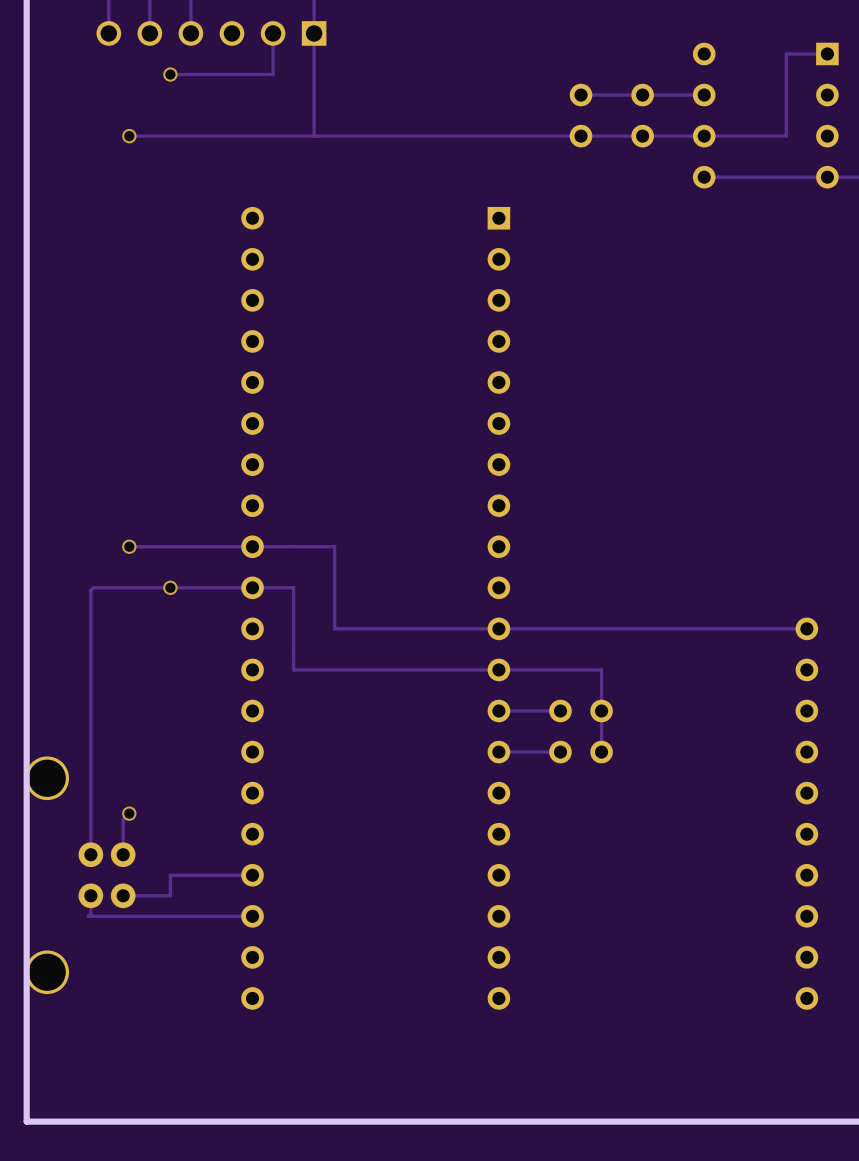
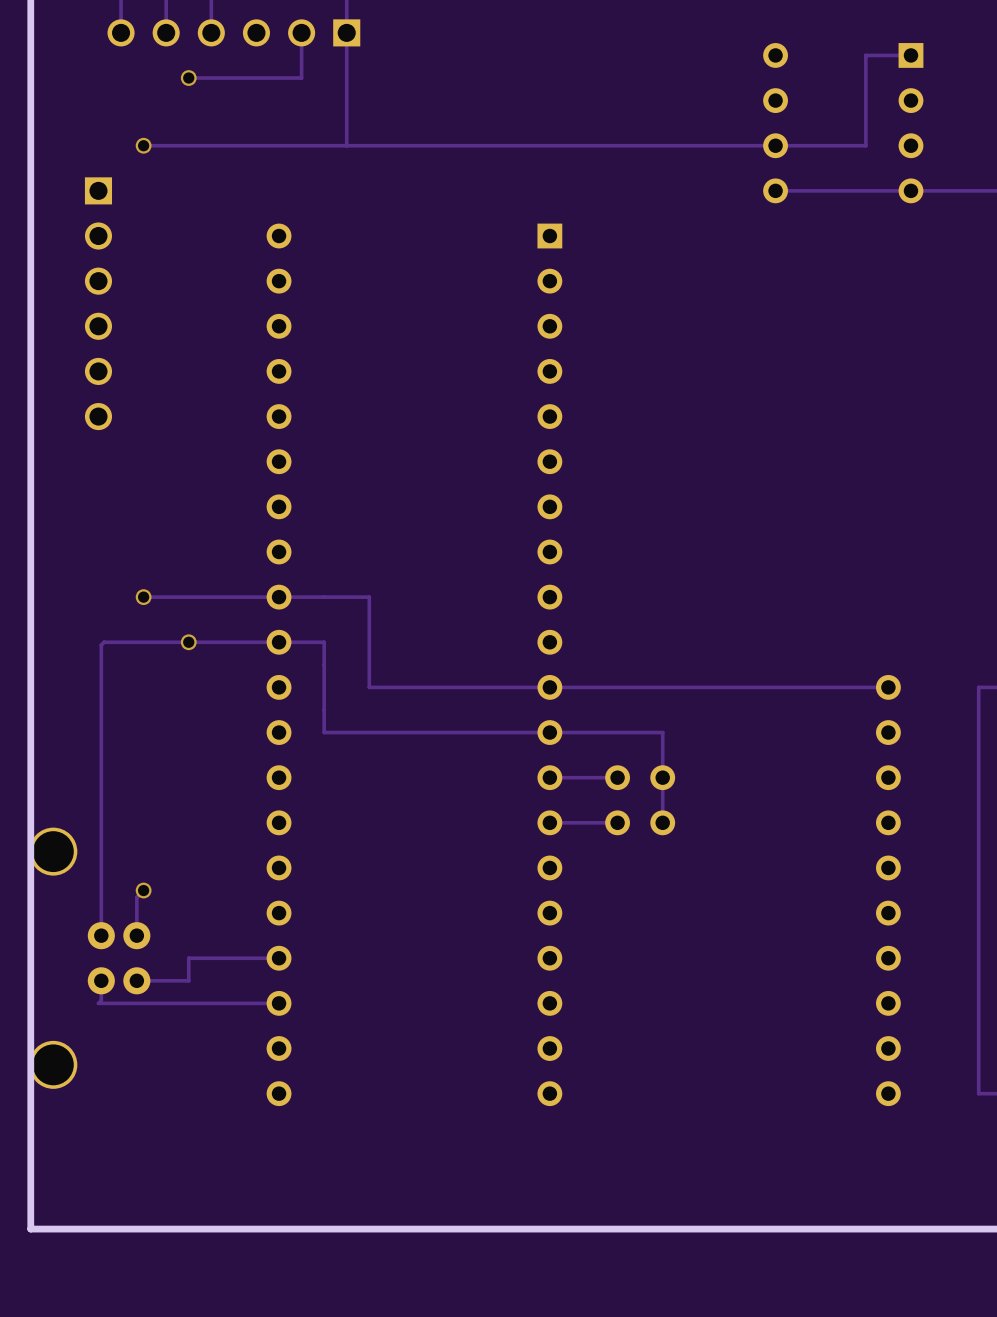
track: (704, 95) (581, 95) -> none
part: (581, 115) -> none
part: (642, 115) -> none
part: none -> (98, 303)

